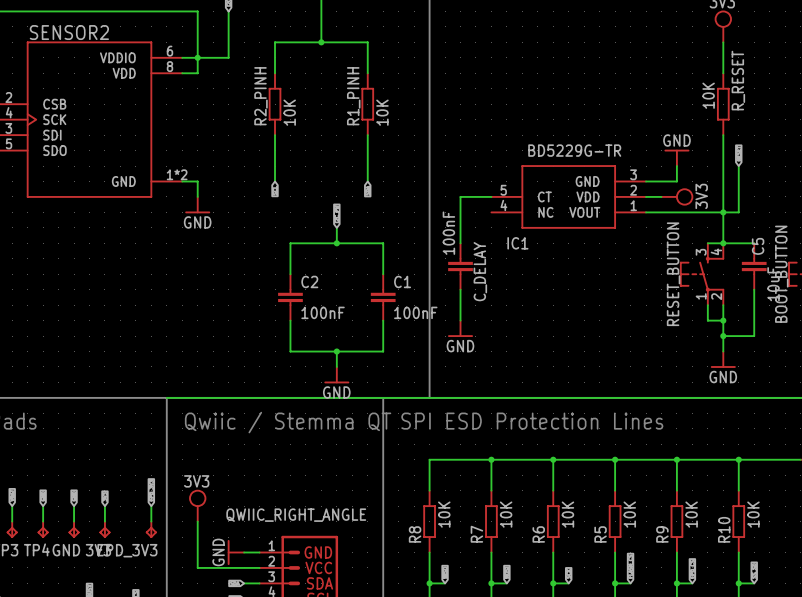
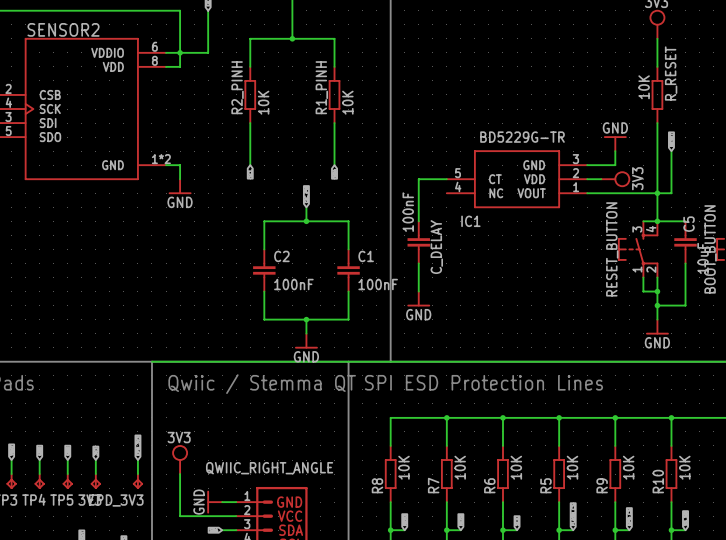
GND name: GND (66, 550) -> TP5 (61, 500)

